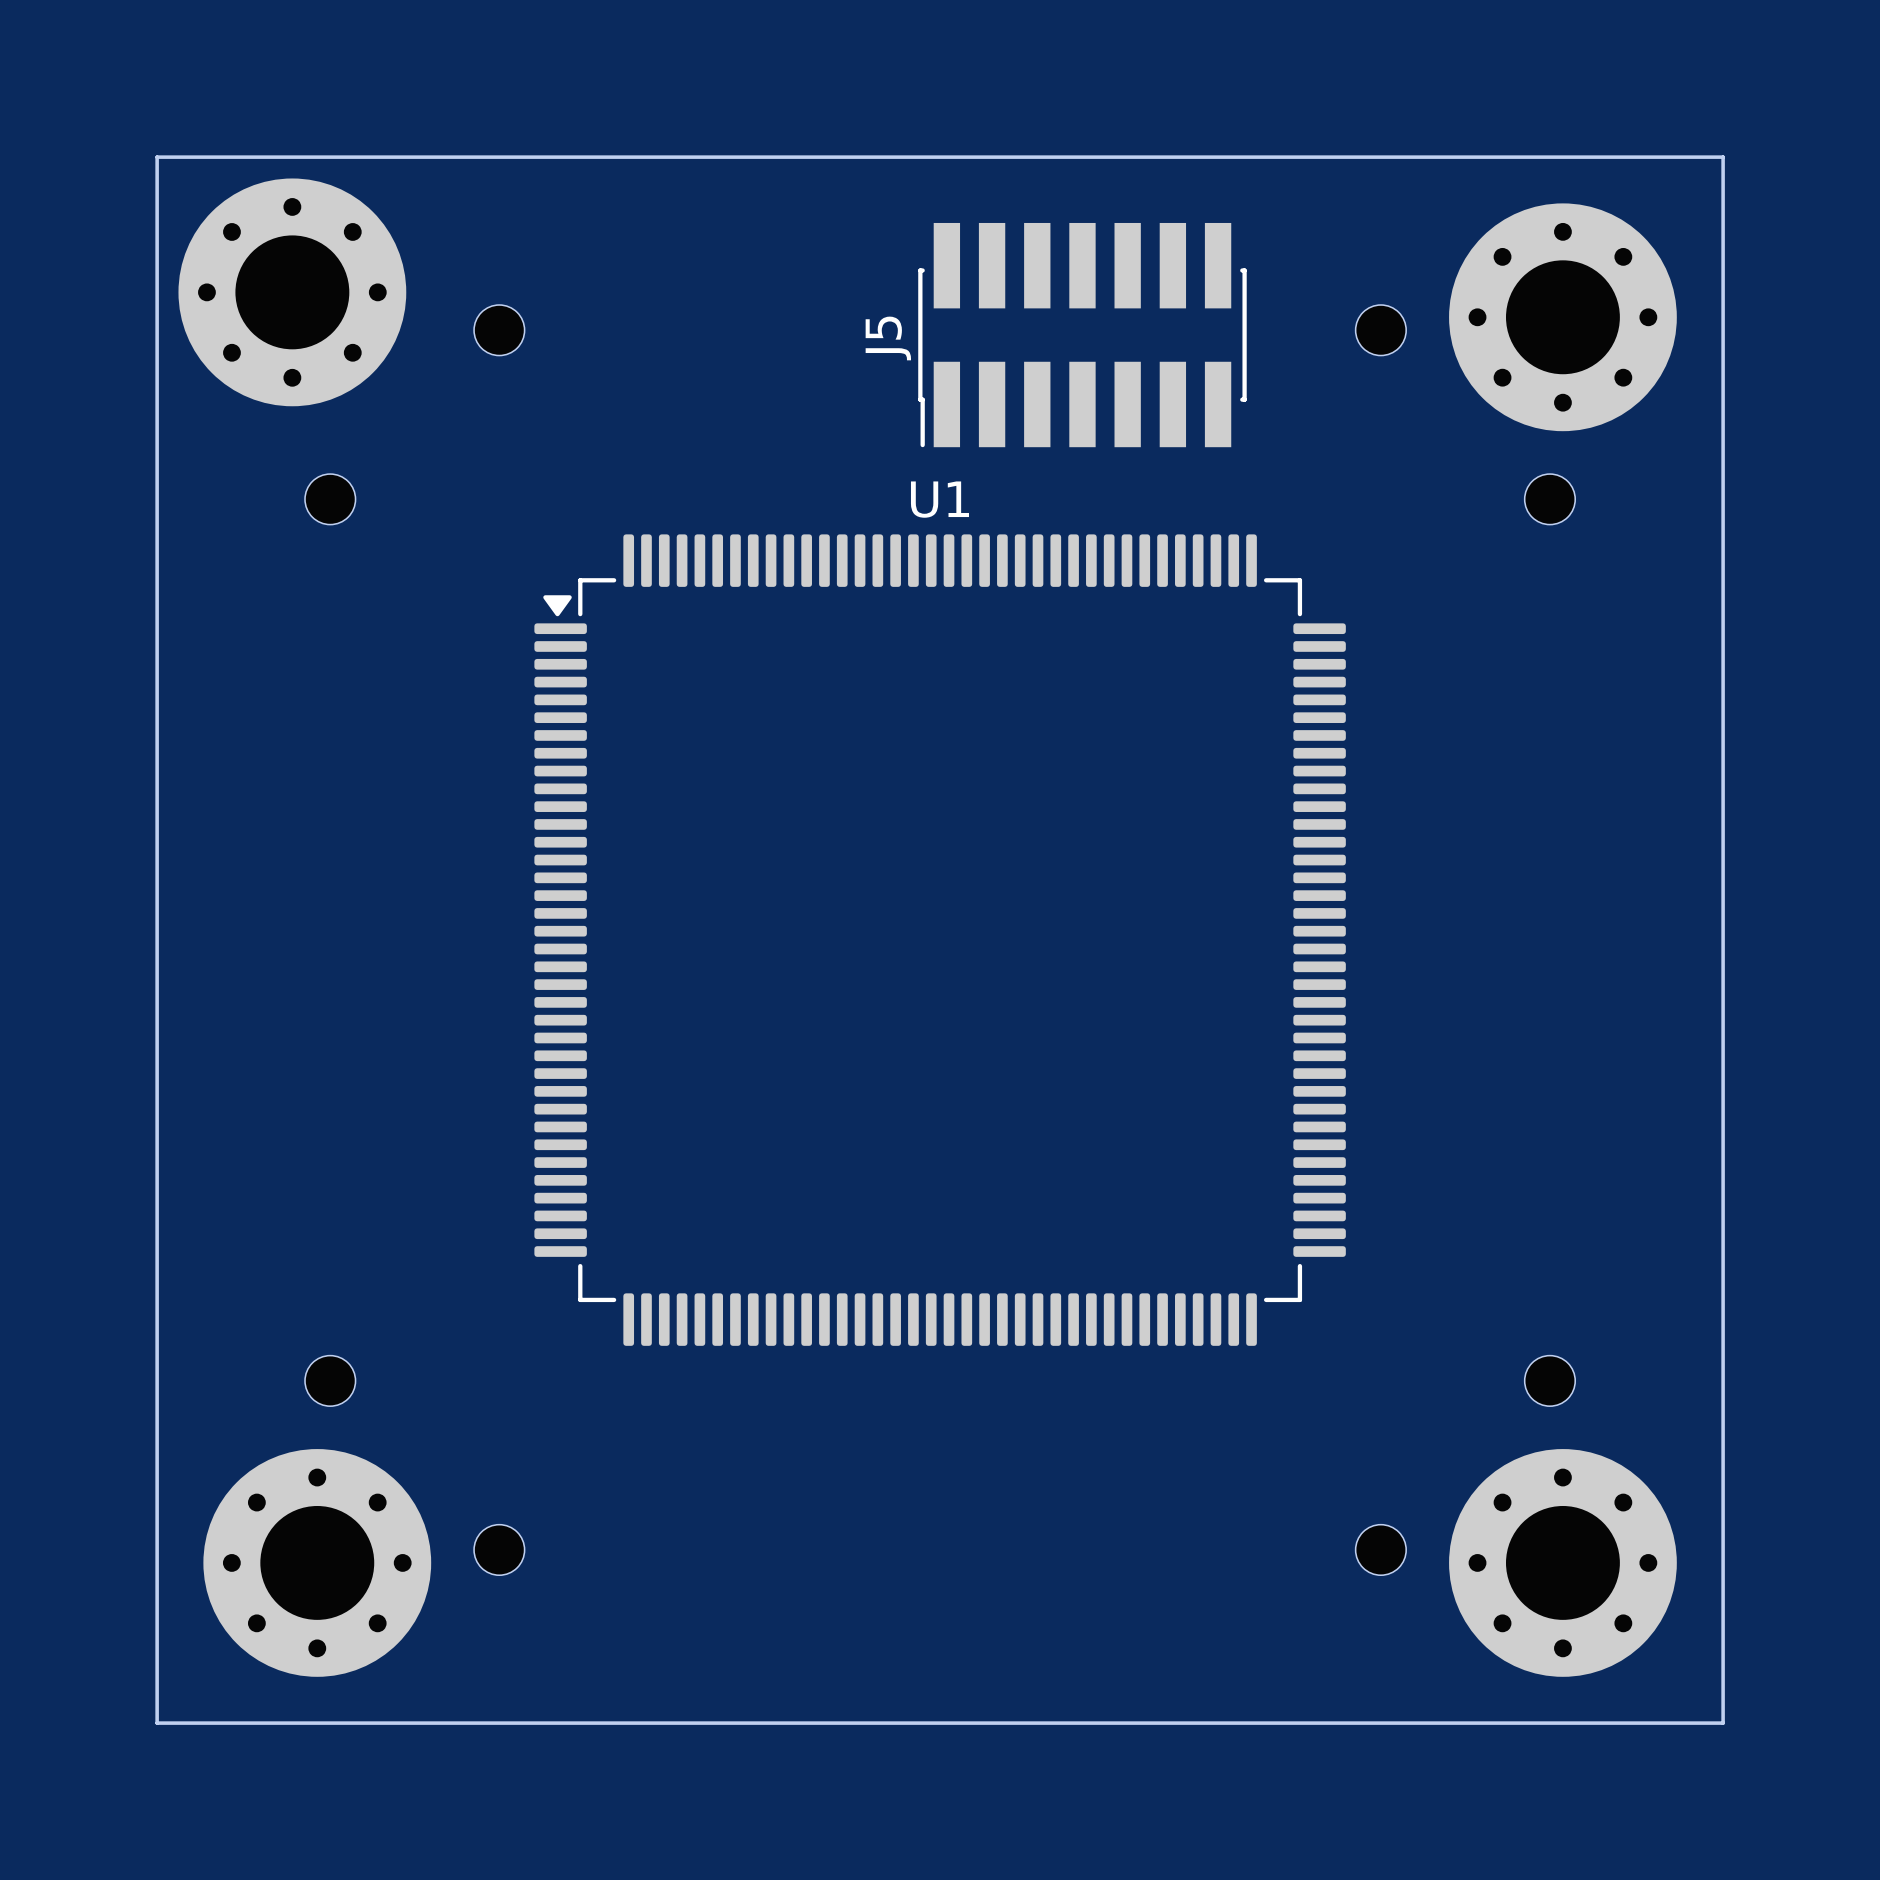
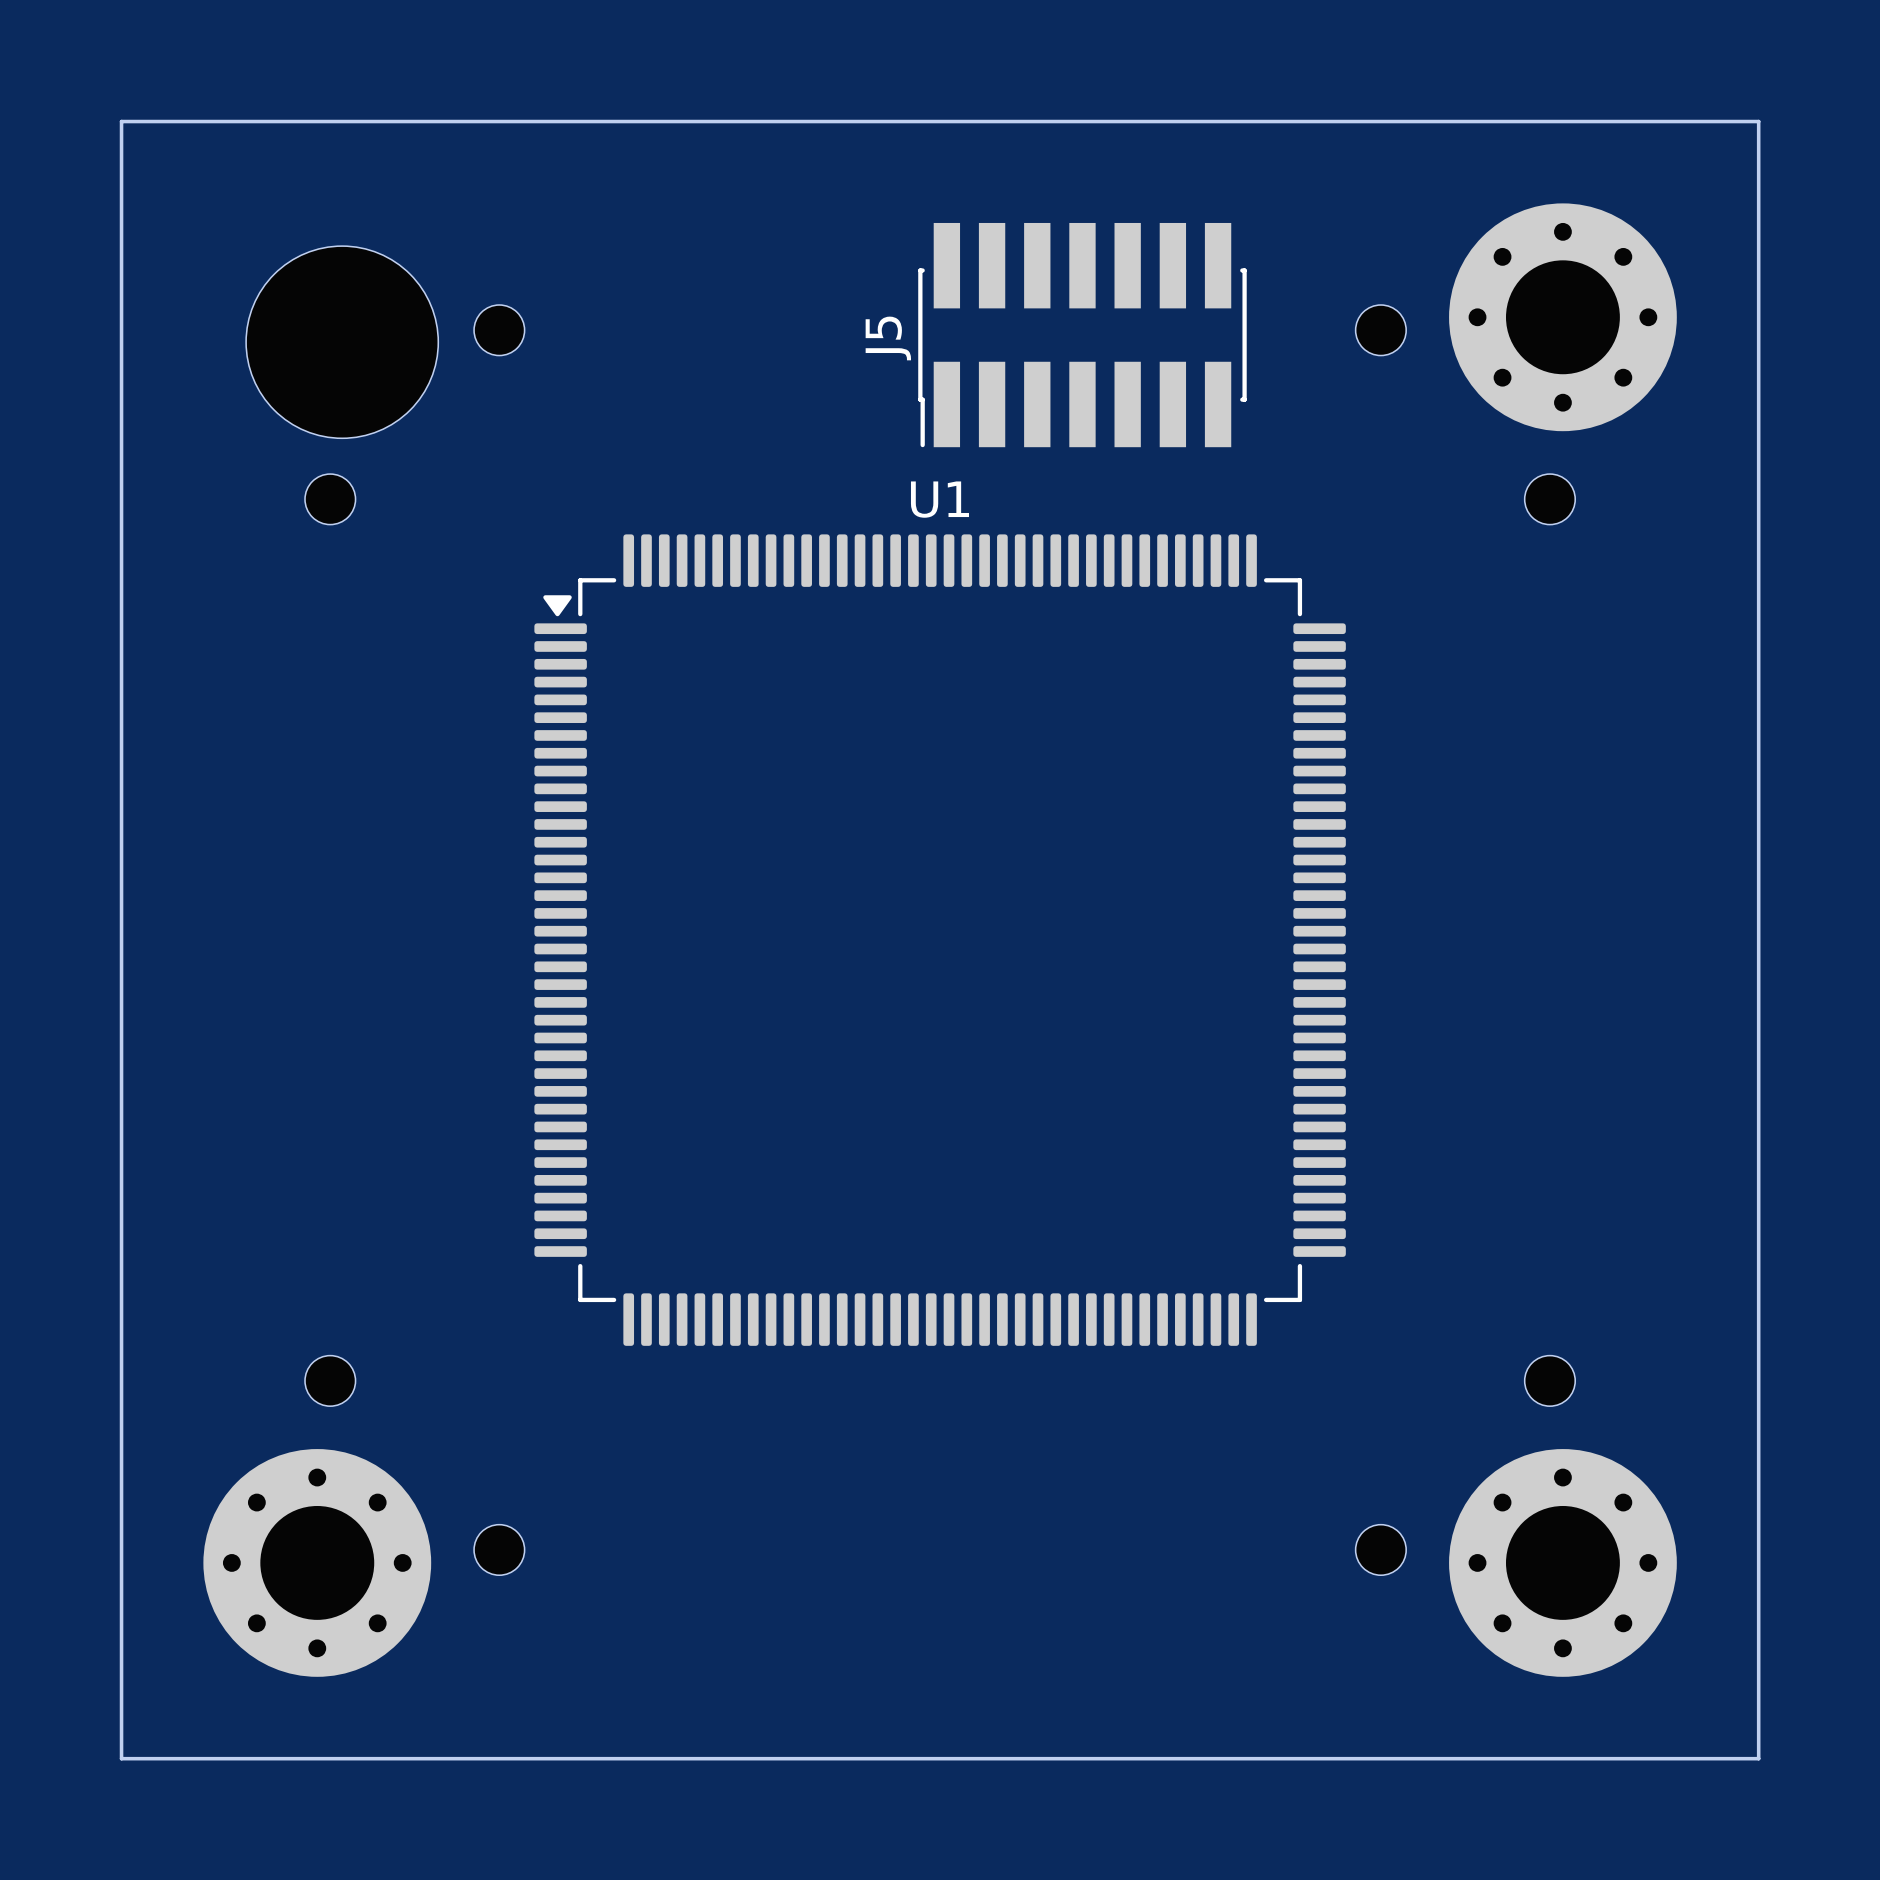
board edge: (157, 157) (1723, 157) (1723, 1723) (157, 1723) (157, 157) -> (121, 121) (121, 1758) (1758, 1758) (1758, 121) (121, 121)
part: (292, 292) -> none
part: none -> (342, 342)

